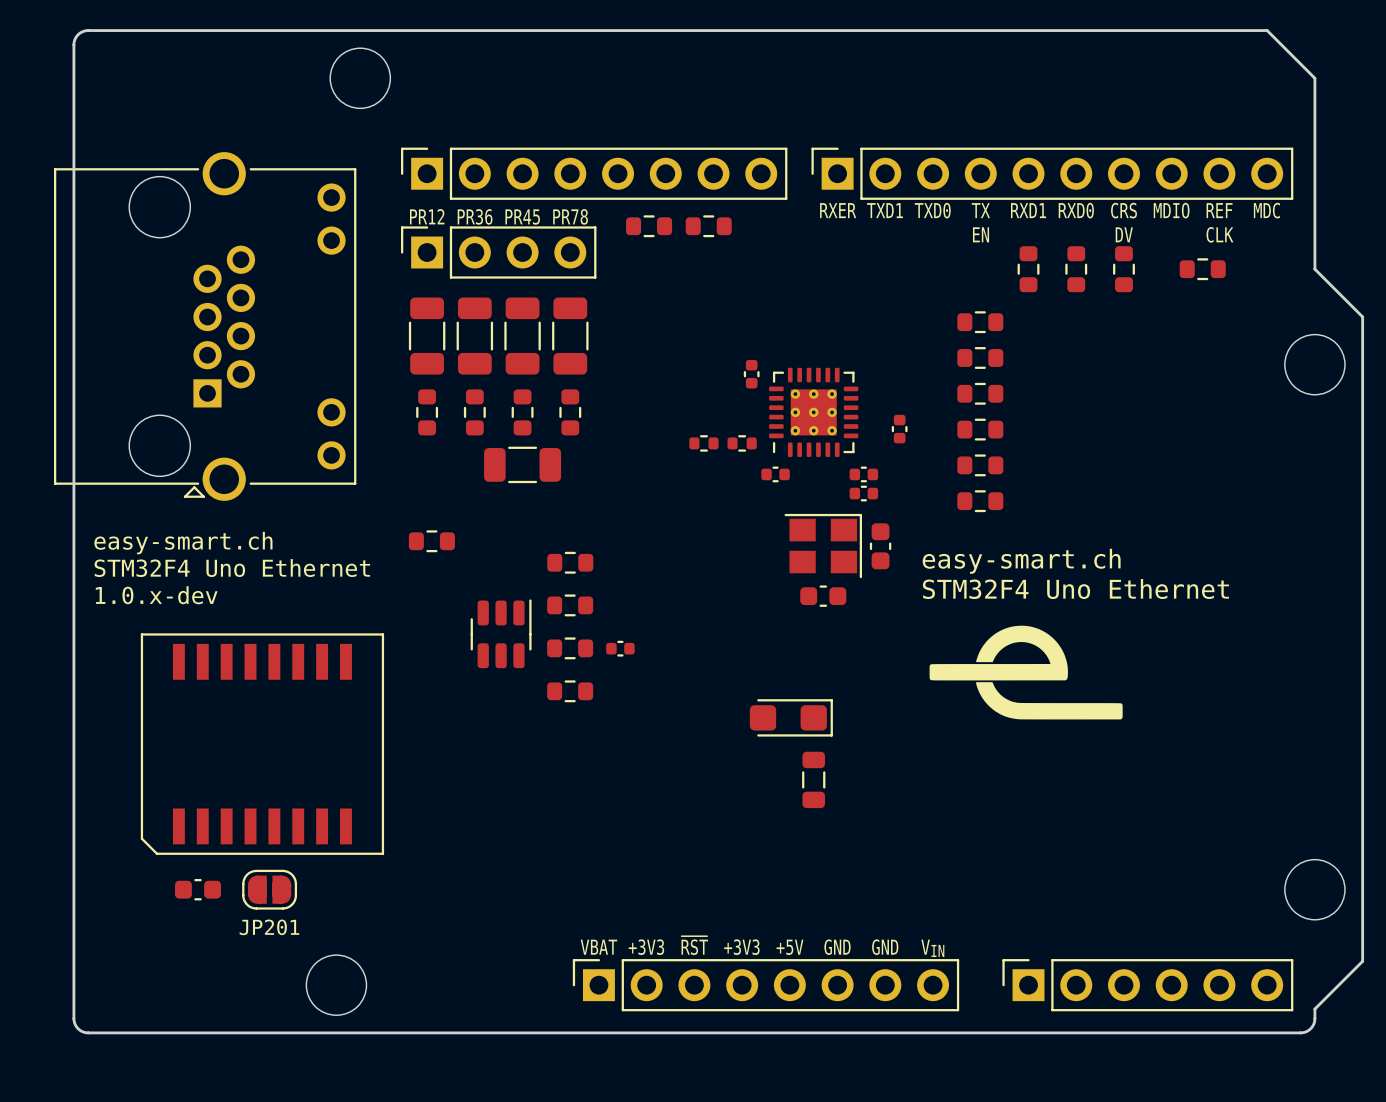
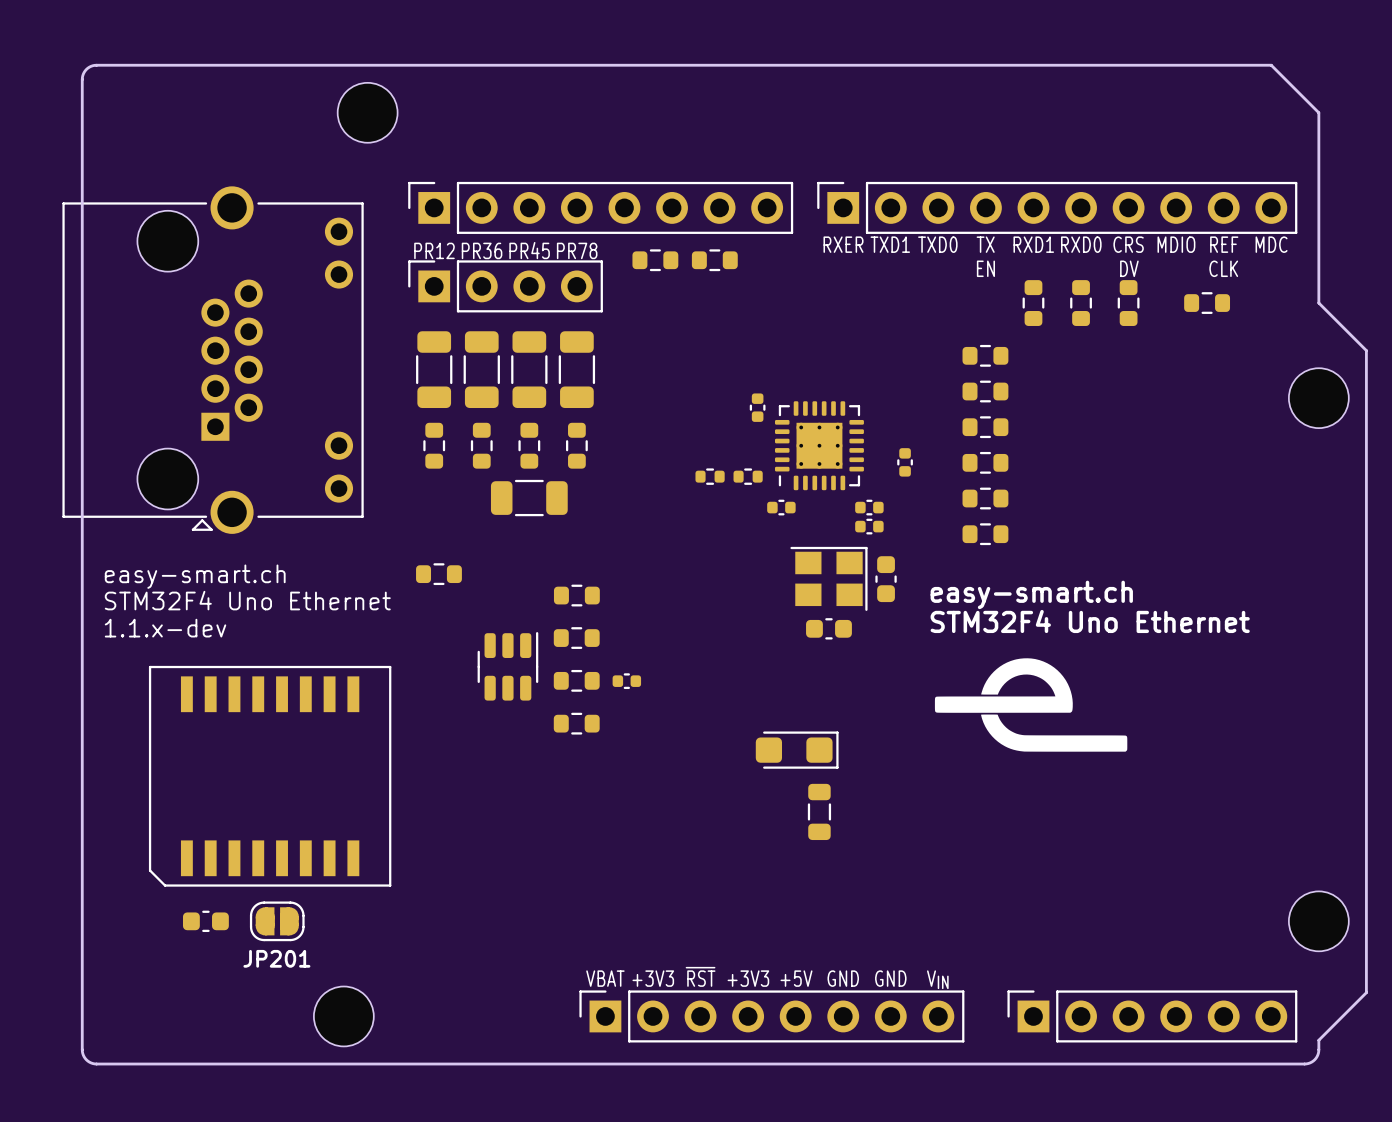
text: 1.0.x-dev (156, 595) -> 1.1.x-dev (165, 628)

